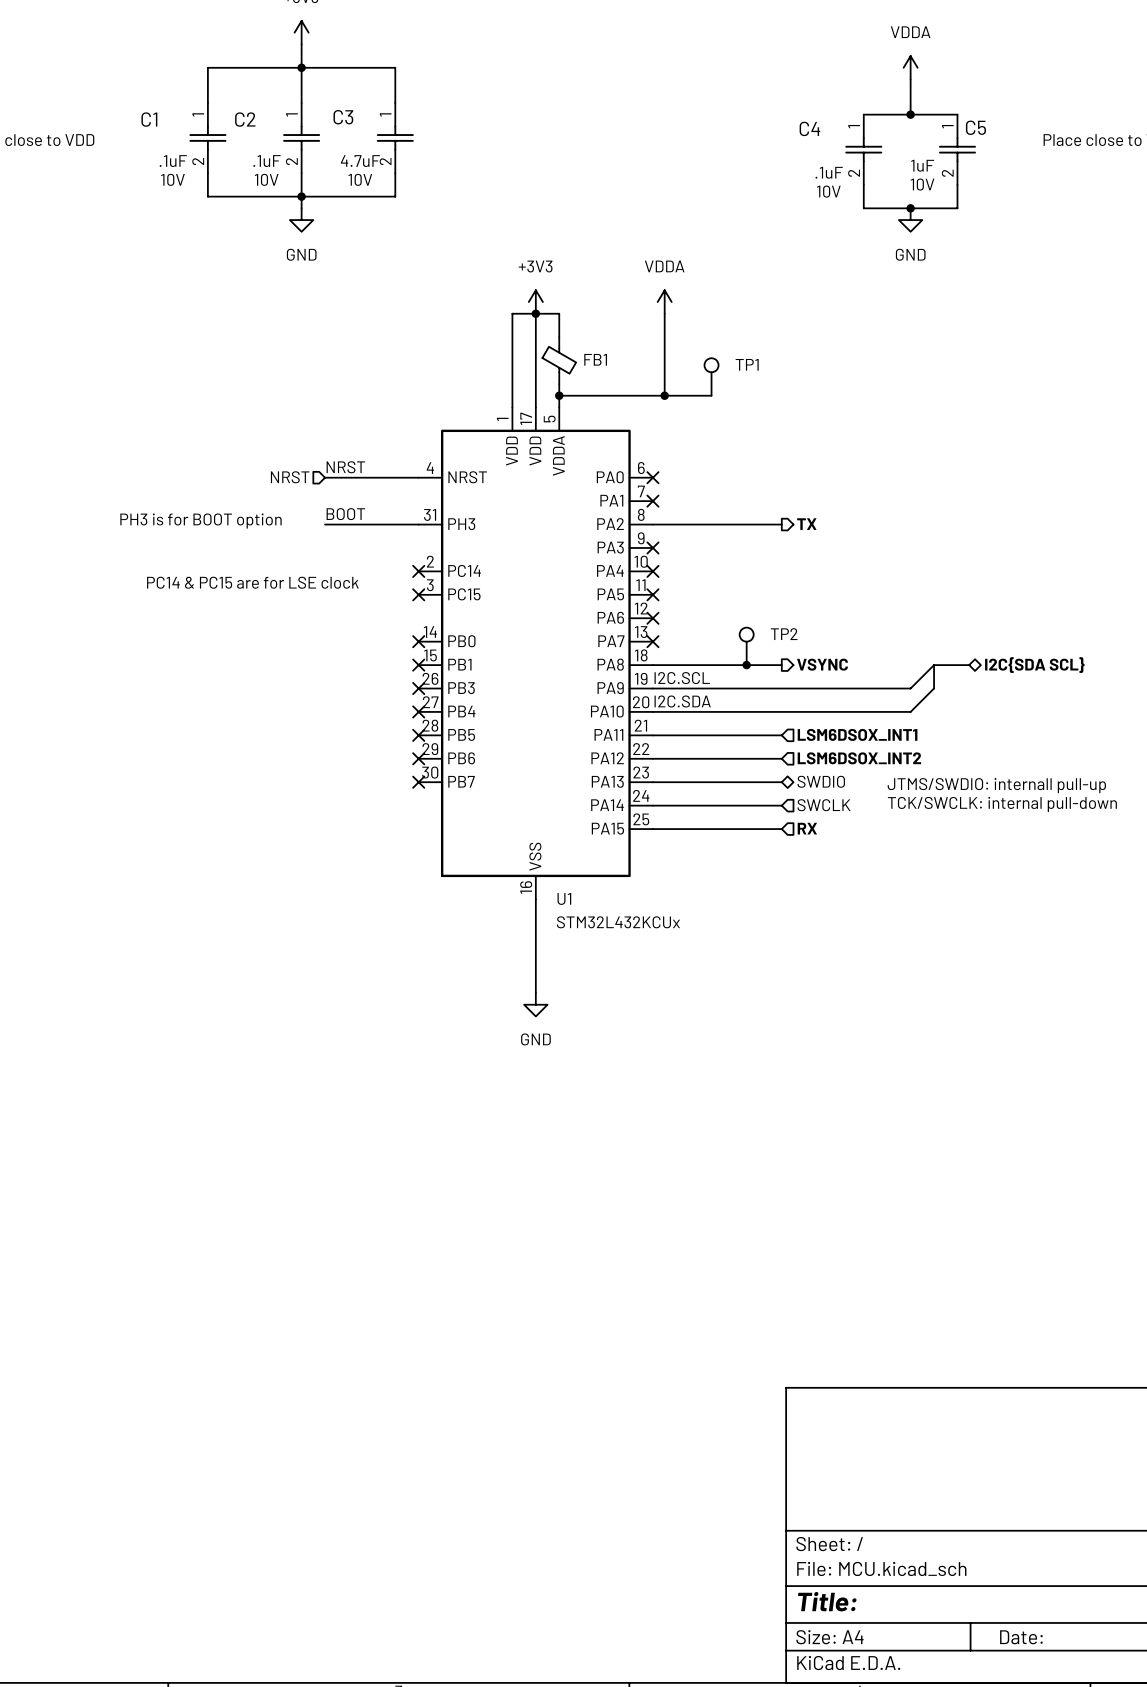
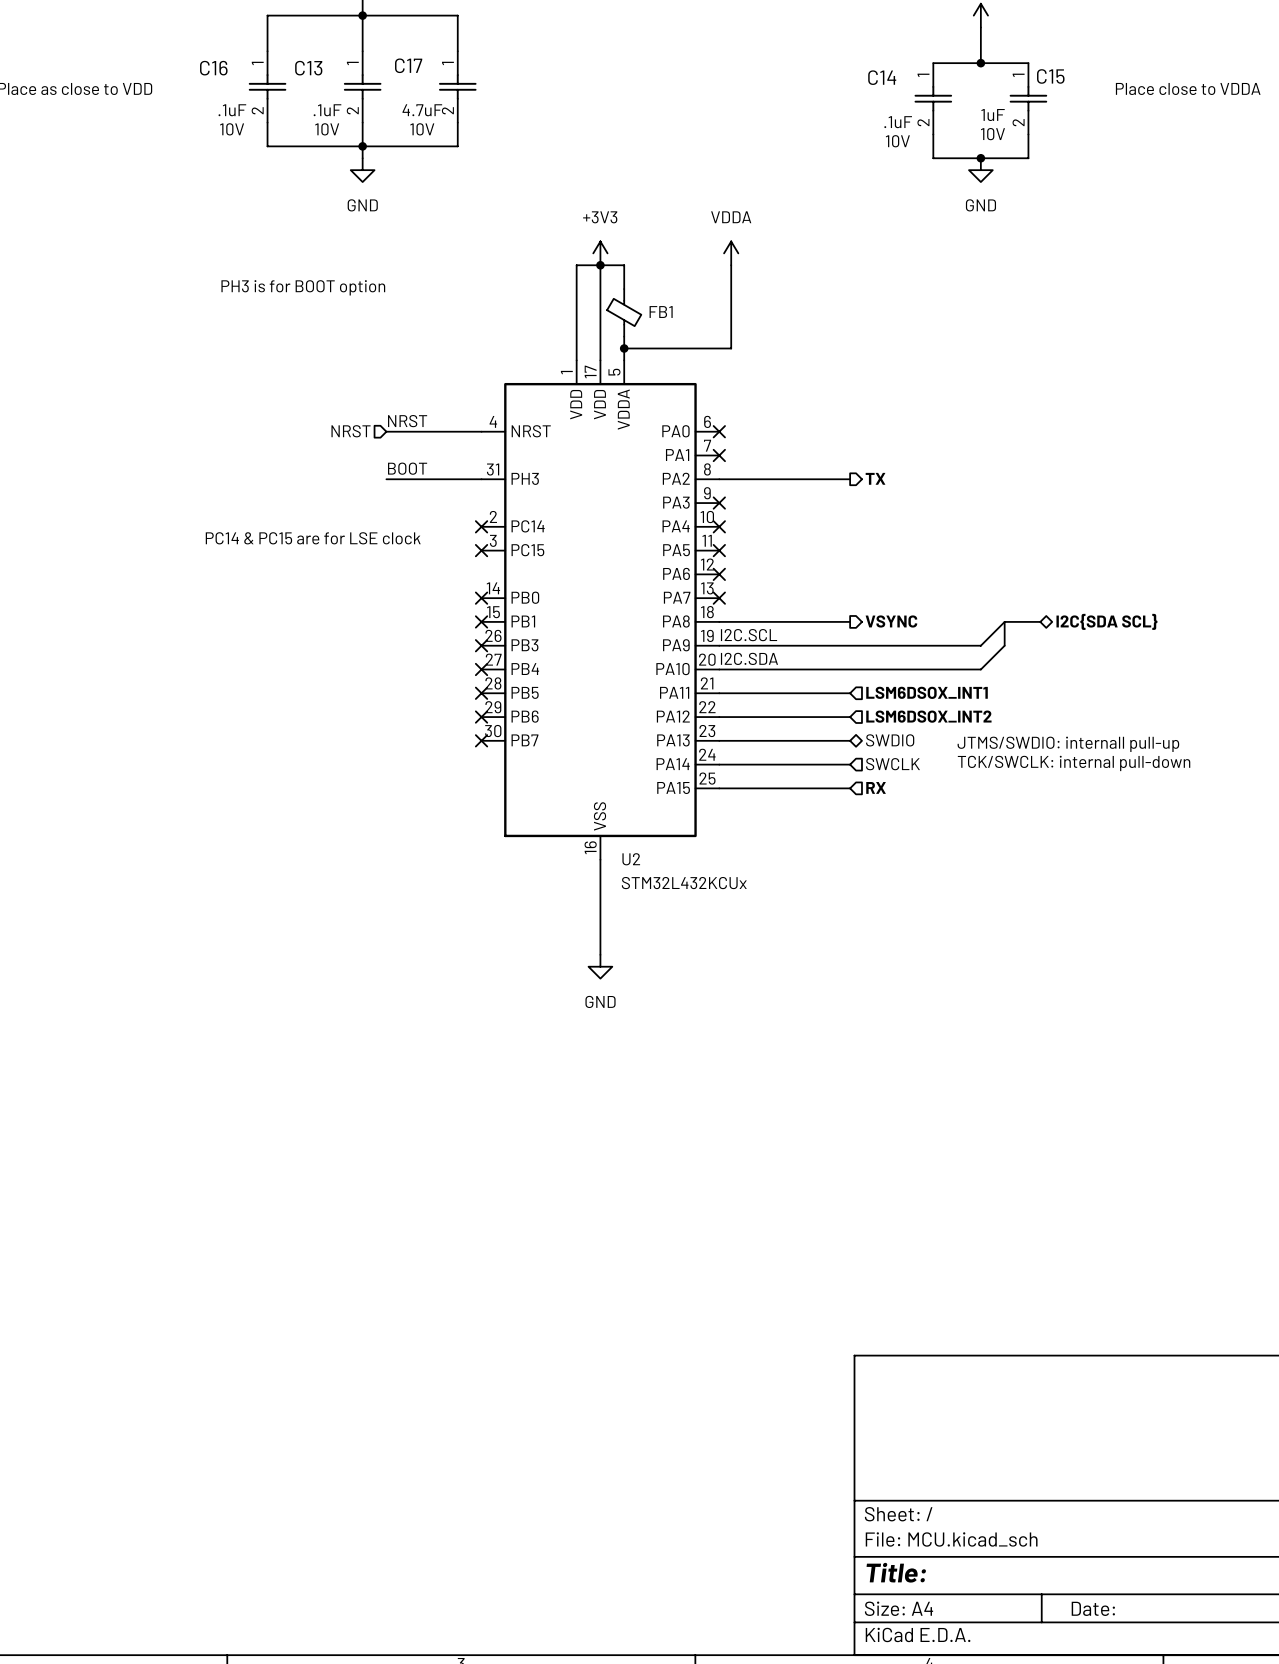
C3 name: C3 (343, 117) -> C17 (408, 65)
C1 name: C1 (149, 119) -> C16 (213, 68)
C2 name: C2 (245, 119) -> C13 (308, 68)
C5 name: C5 (975, 127) -> C15 (1050, 76)
C4 name: C4 (809, 128) -> C14 (882, 77)
TP1: (711, 376) -> none
wire: (664, 395) (711, 395) -> none
junction: (664, 395) -> none
text position: PH3 is for BOOT option (201, 521) -> PH3 is for BOOT option (303, 287)
TP2: (746, 646) -> none
junction: (746, 665) -> none
U1 name: U1 (564, 898) -> U2 (631, 859)

